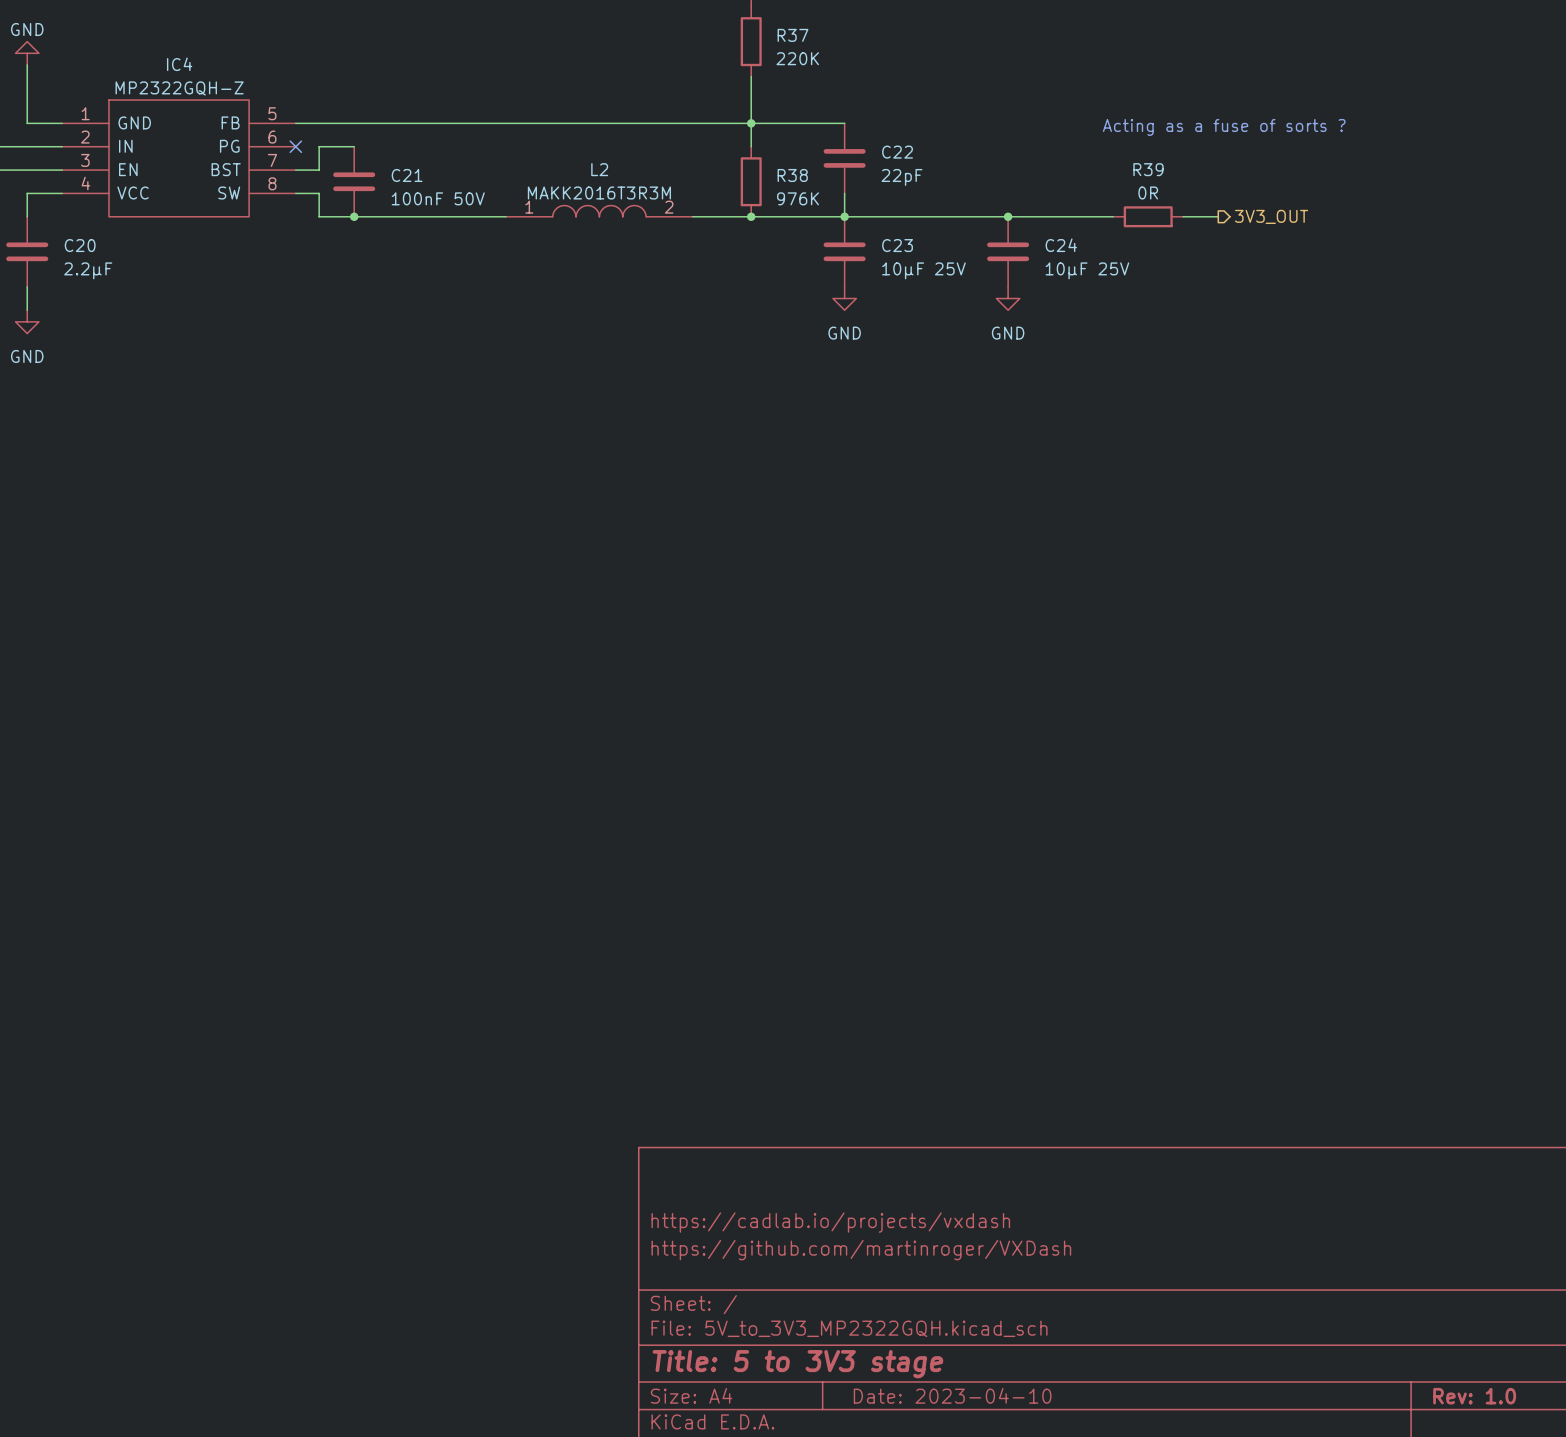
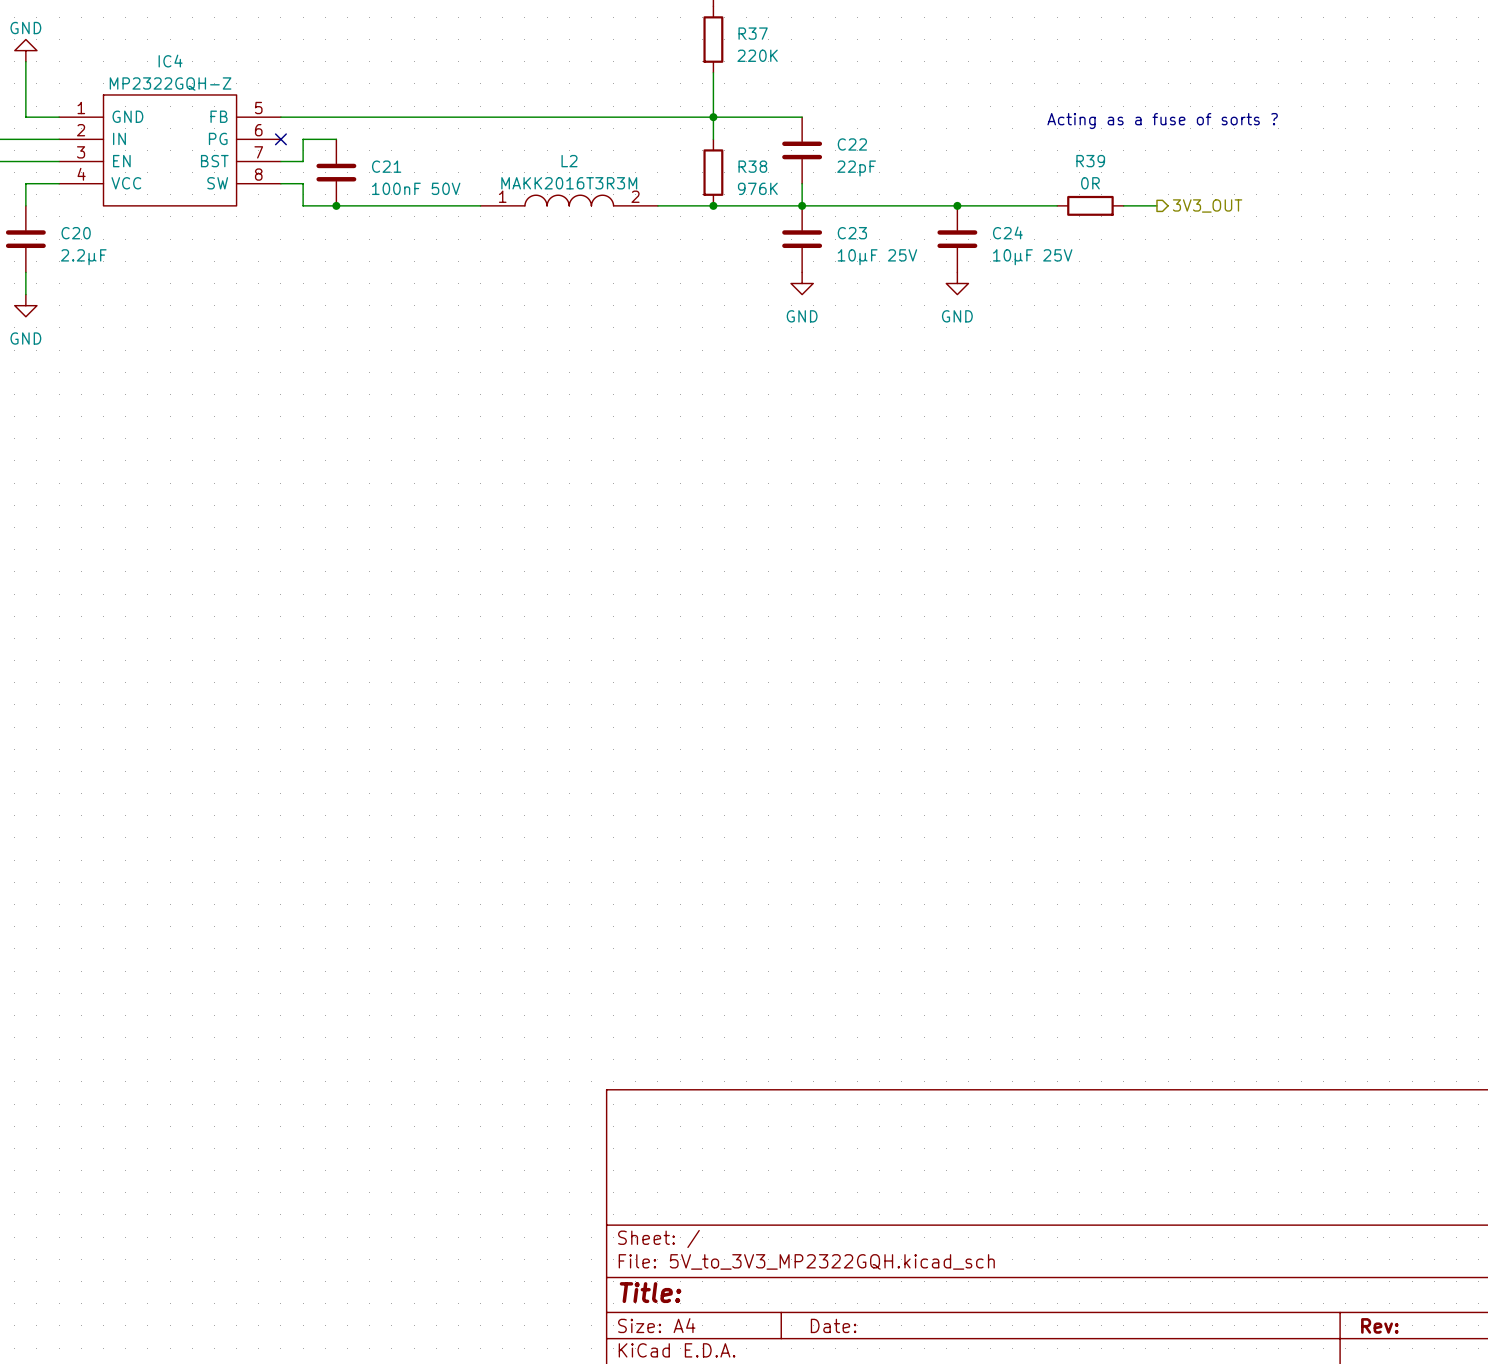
title block: https://cadlab.io/projects/vxdash (830, 1222) -> none
title block: https://github.com/martinroger/VXDash (861, 1250) -> none
title block: Title: 5 to 3V3 stage (797, 1364) -> Title: (650, 1292)
title block: Date: 2023-04-10 (952, 1395) -> Date: (833, 1325)
title block: Rev: 1.0 (1474, 1396) -> Rev: (1379, 1325)

